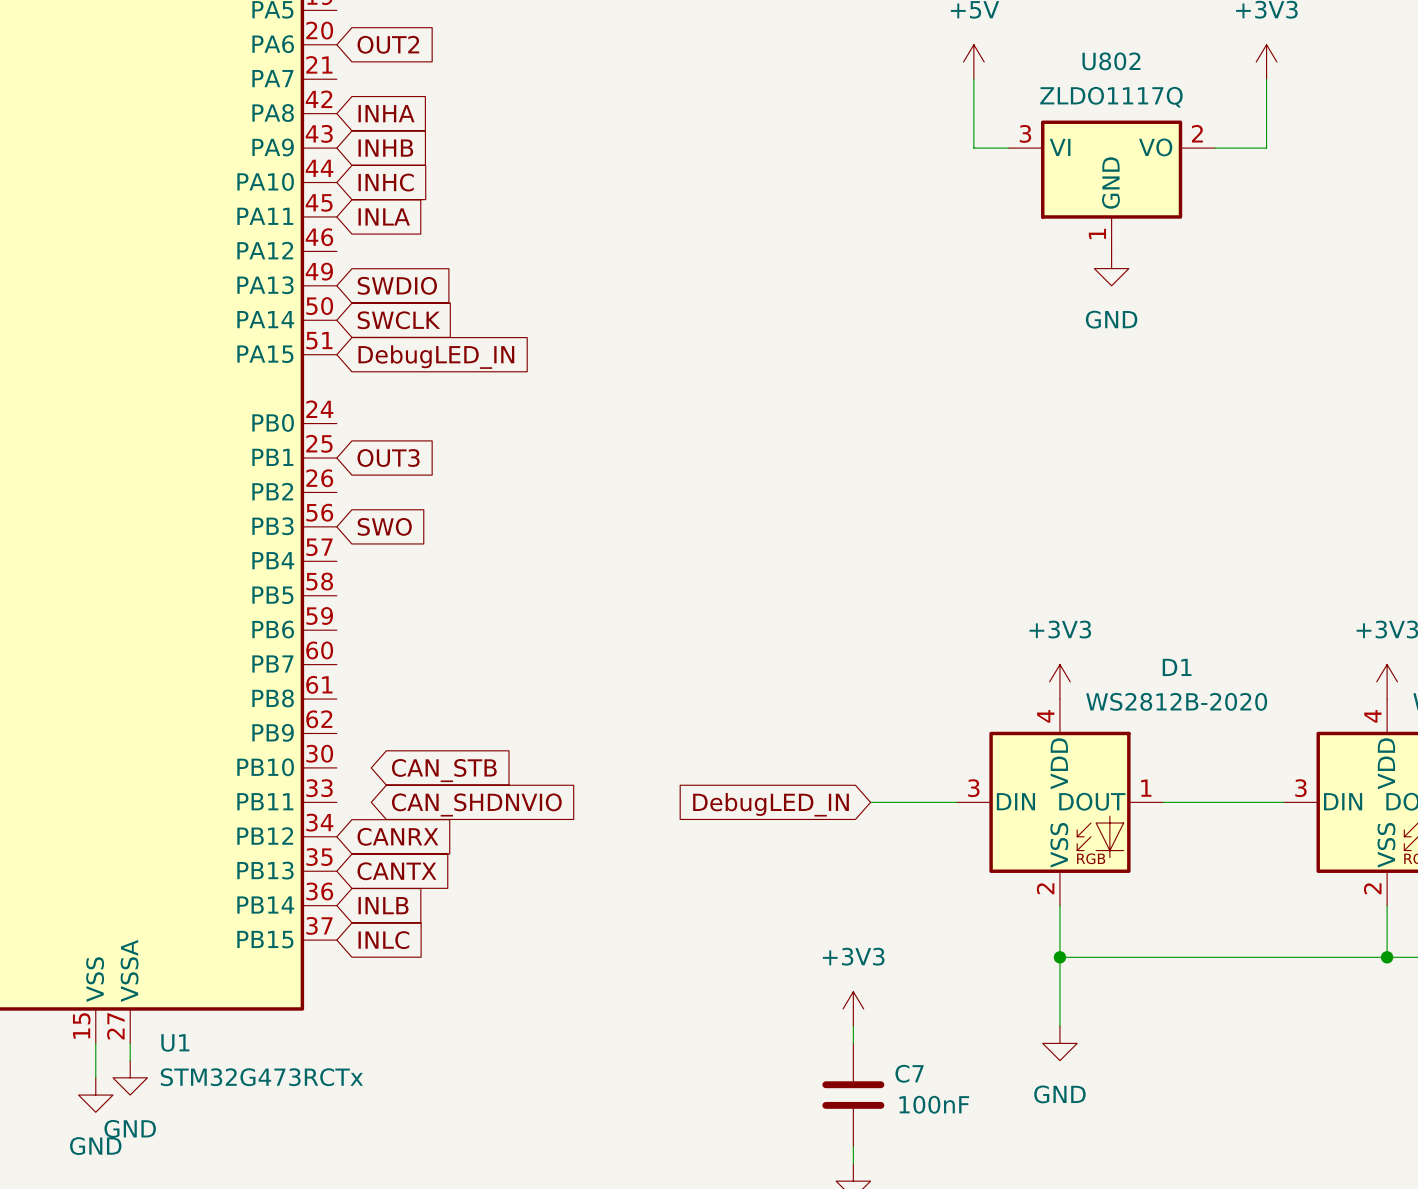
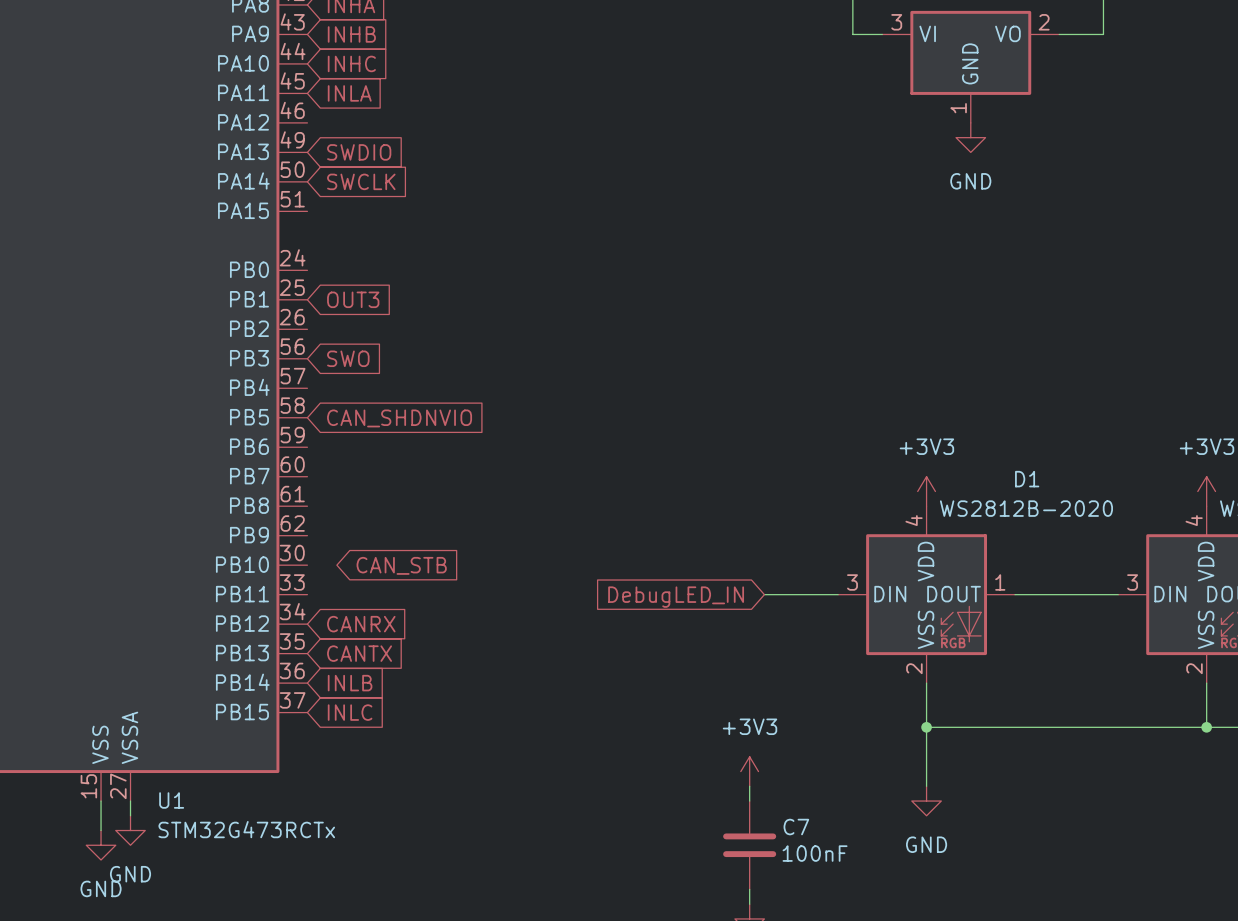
global label: DebugLED_IN (436, 357) -> none
global label position: CAN_SHDNVIO (476, 804) -> CAN_SHDNVIO (399, 418)

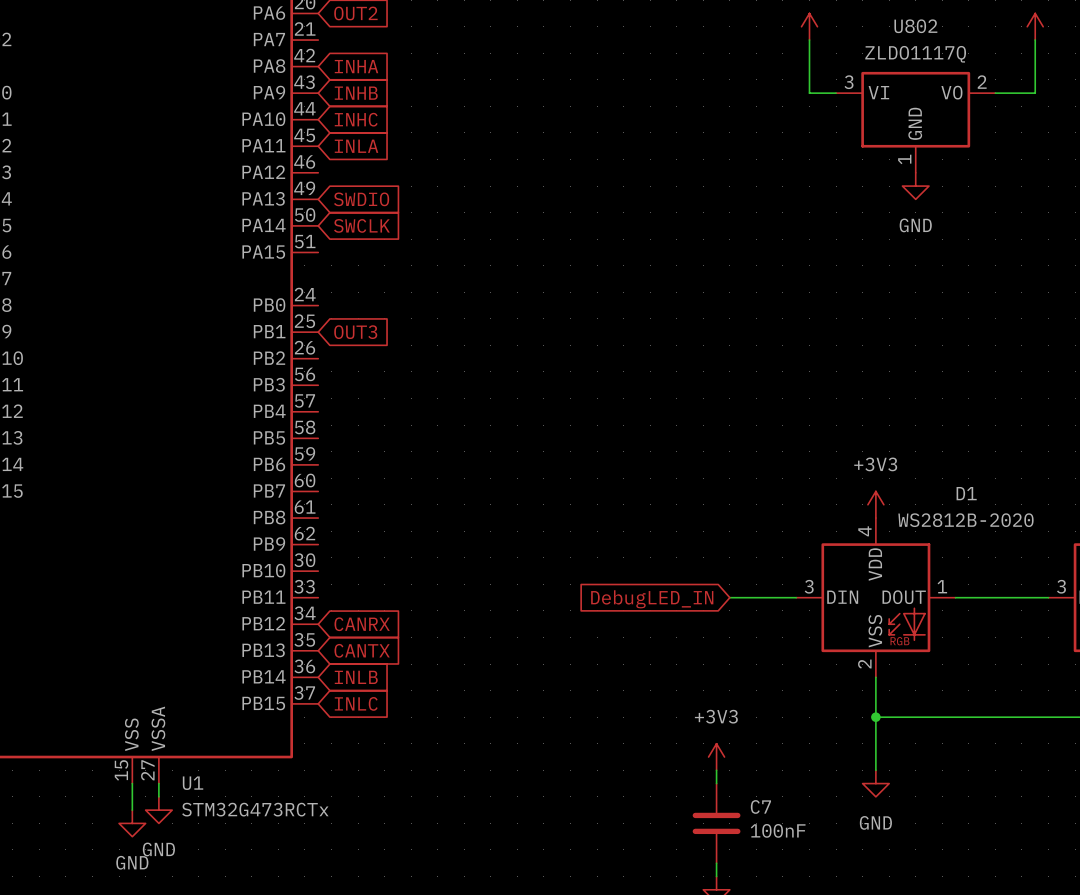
global label: SWO (348, 358) -> none
global label: CAN_SHDNVIO (399, 418) -> none
global label: CAN_STB (401, 565) -> none

